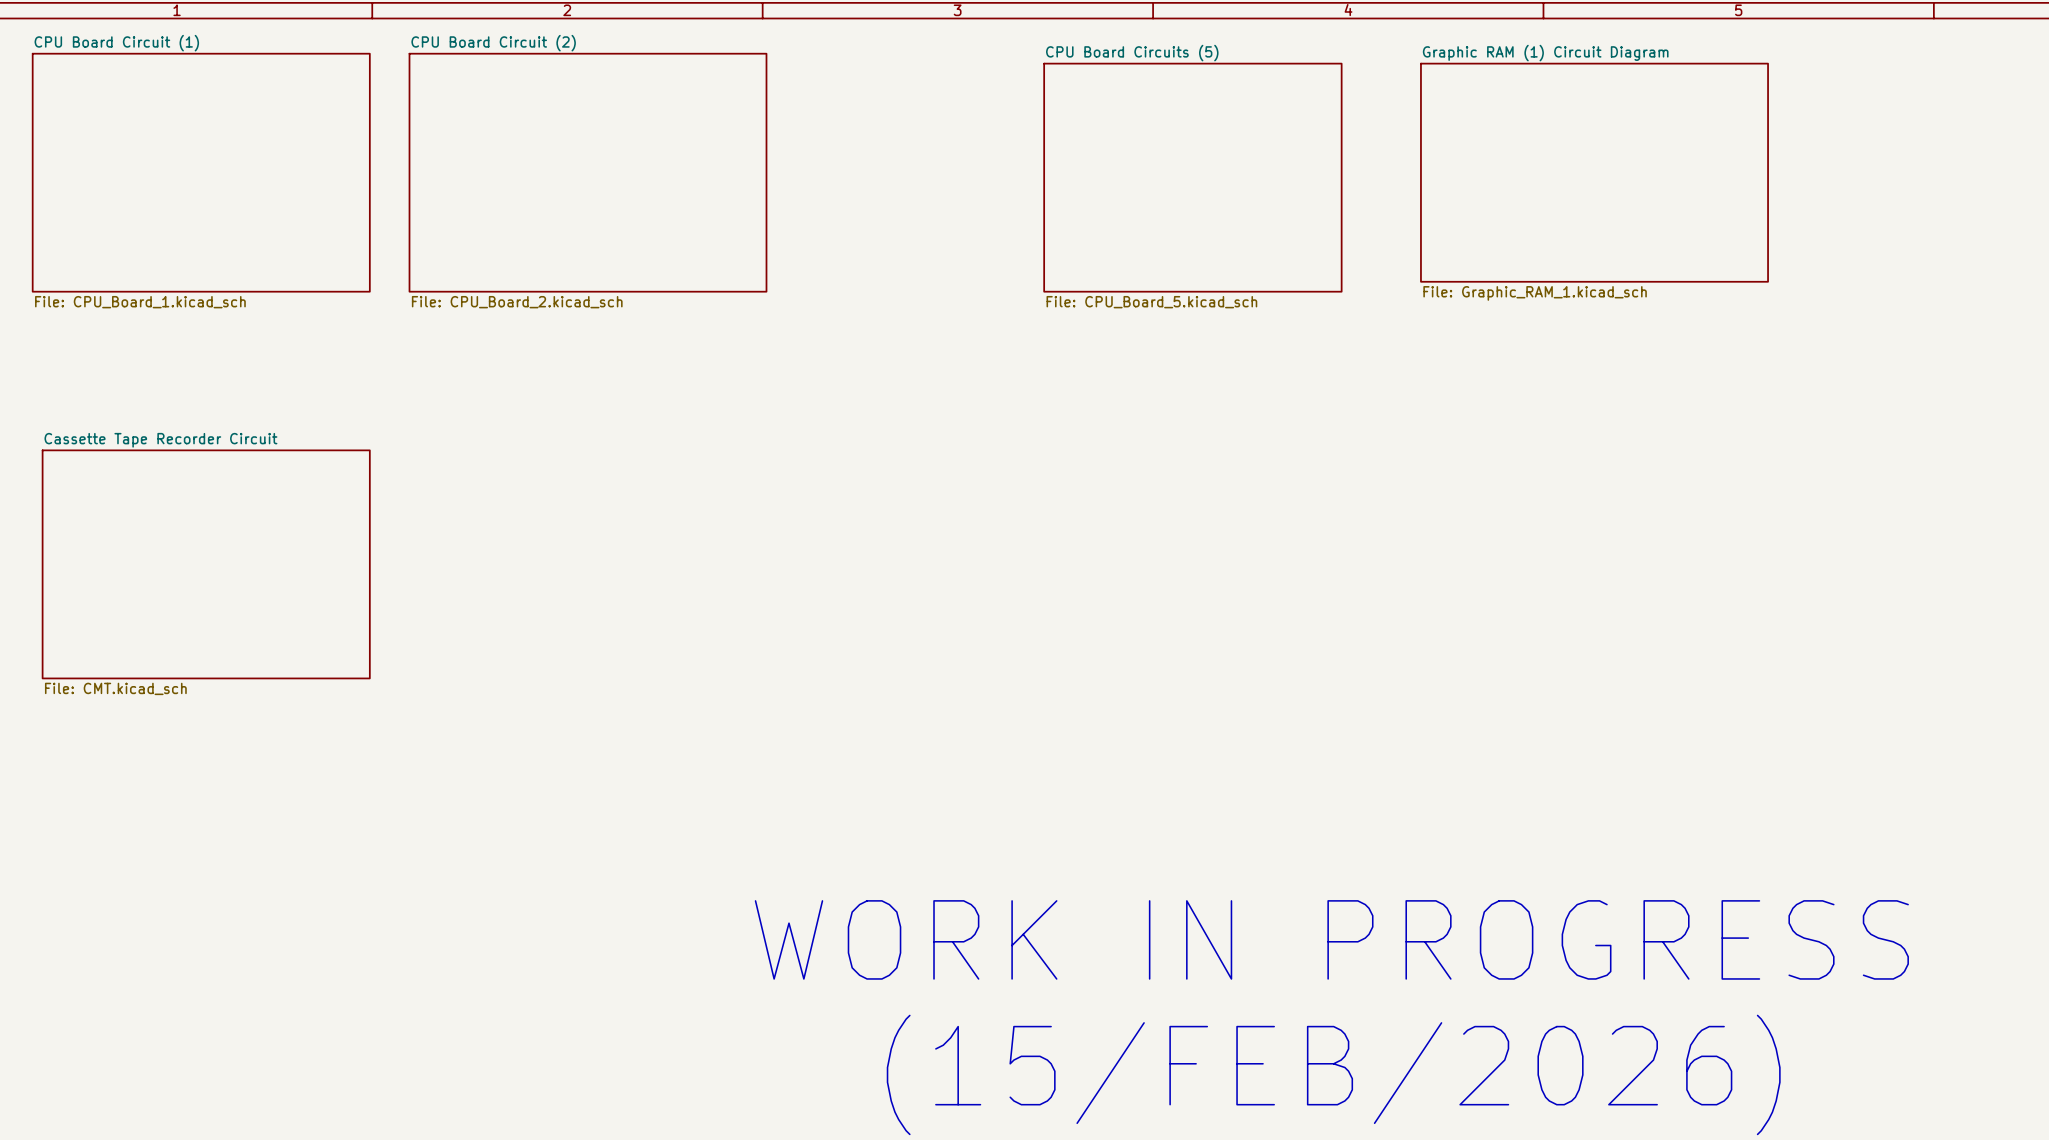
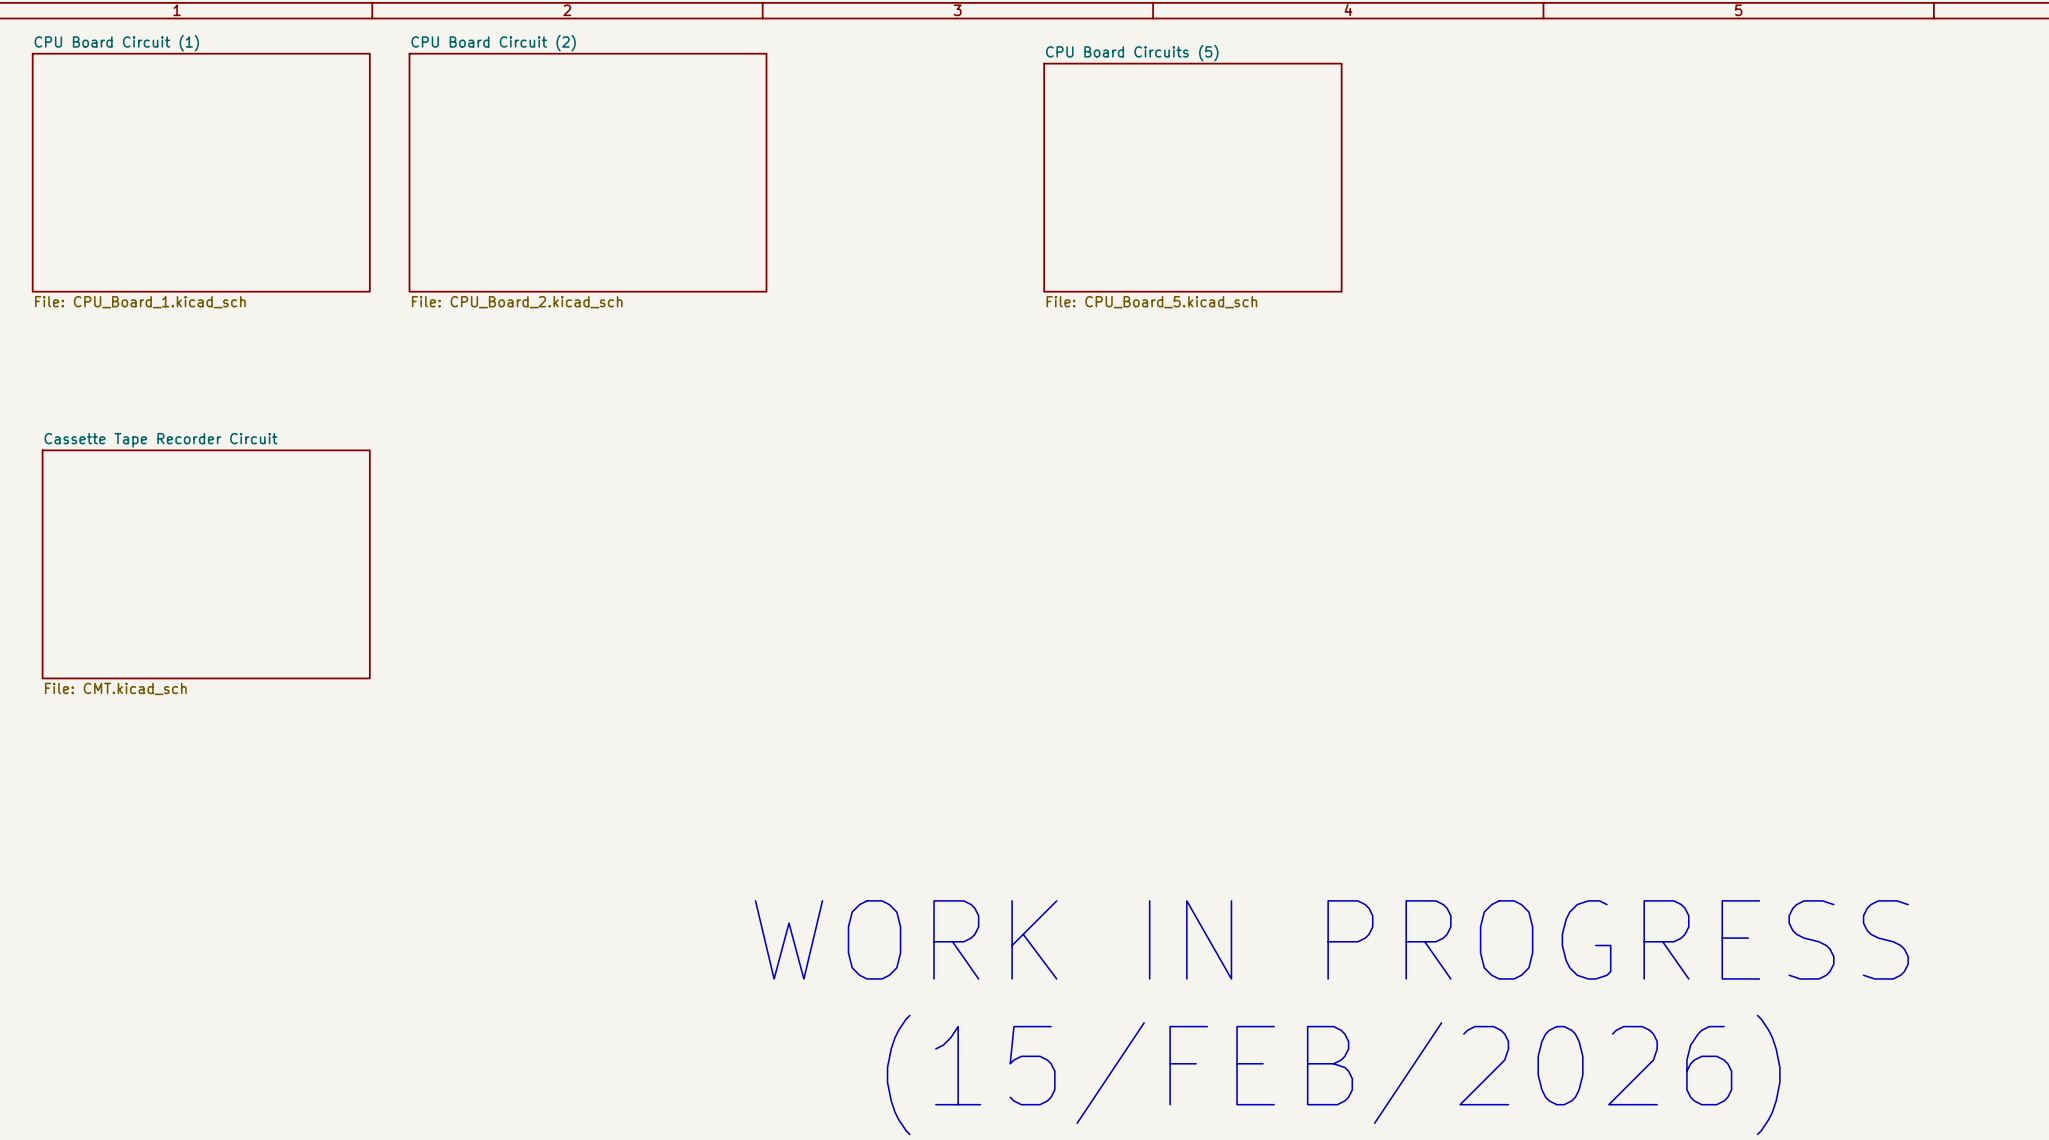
sheet Graphic RAM (1) Circuit Diagram: File: Graphic_RAM_1.kicad_sch (1594, 172) -> none

